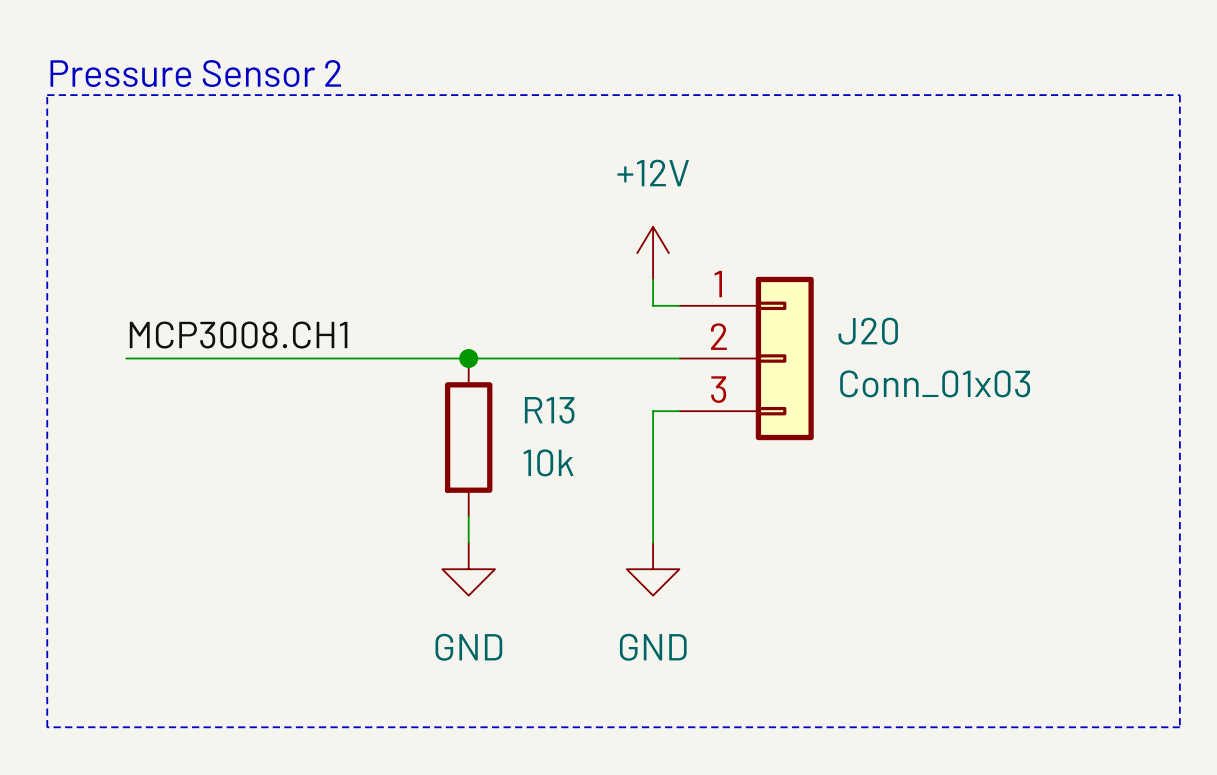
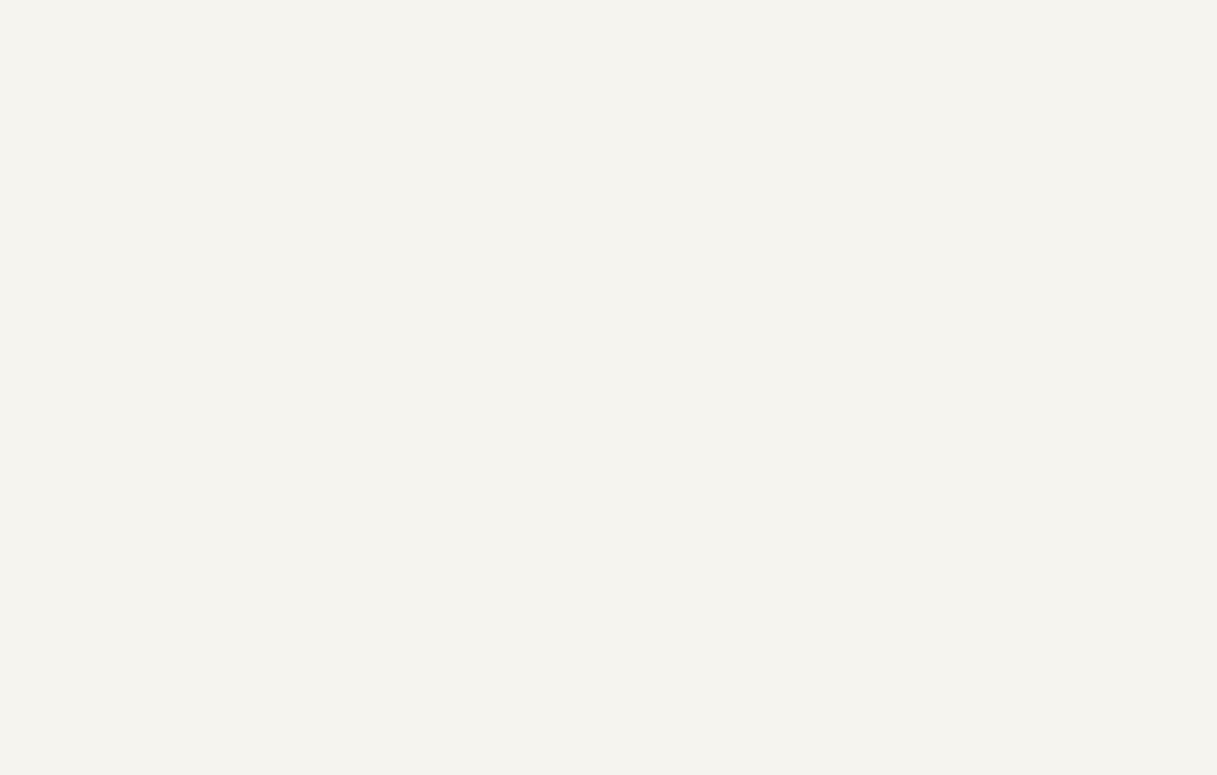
text: Pressure Sensor 2 (195, 73) -> none
line: (47, 95) (1179, 95) (1179, 727) (47, 727) (47, 95) -> none
power symbol: +12V (653, 253) -> none
wire: (653, 279) (653, 305) (679, 305) -> none
label: MCP3008.CH1 (238, 335) -> none
wire: (126, 358) (679, 358) -> none
junction: (468, 358) -> none
J20: Conn_01x03 (746, 358) -> none
wire: (679, 411) (653, 411) (653, 542) -> none
R13: 10k (468, 437) -> none
wire: (468, 516) (468, 542) -> none
power symbol: GND (468, 569) -> none
power symbol: GND (653, 569) -> none

